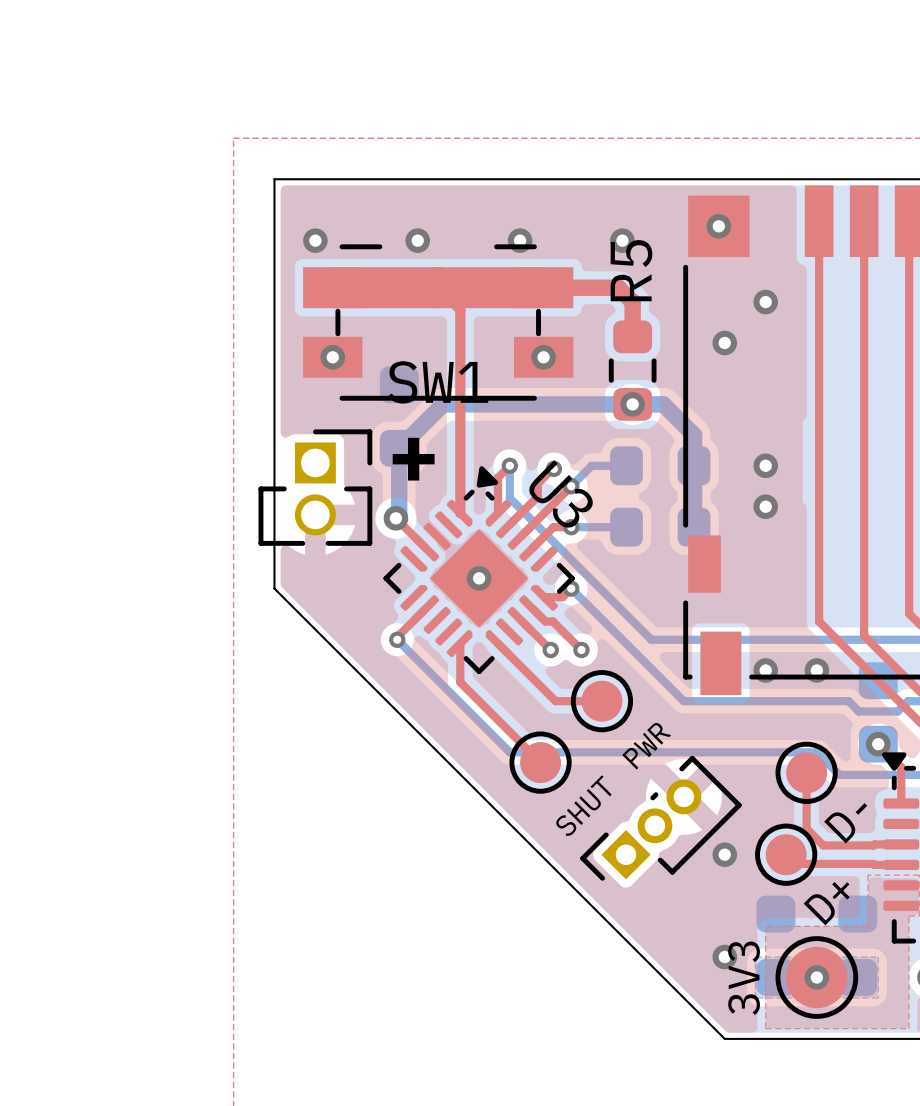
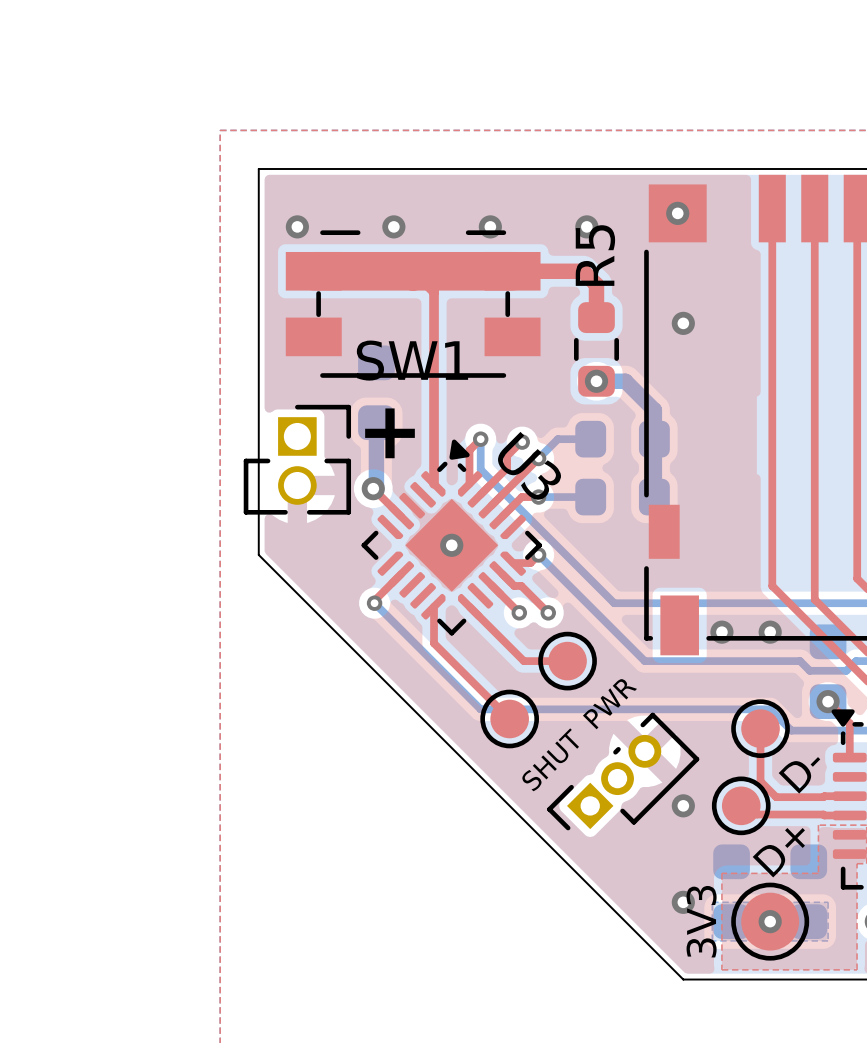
via: (765, 302) -> none
via: (332, 357) -> none
via: (543, 357) -> none
bottom track: (632, 404) (443, 404) (399, 448) -> none
via: (765, 465) -> none
via: (765, 506) -> none

